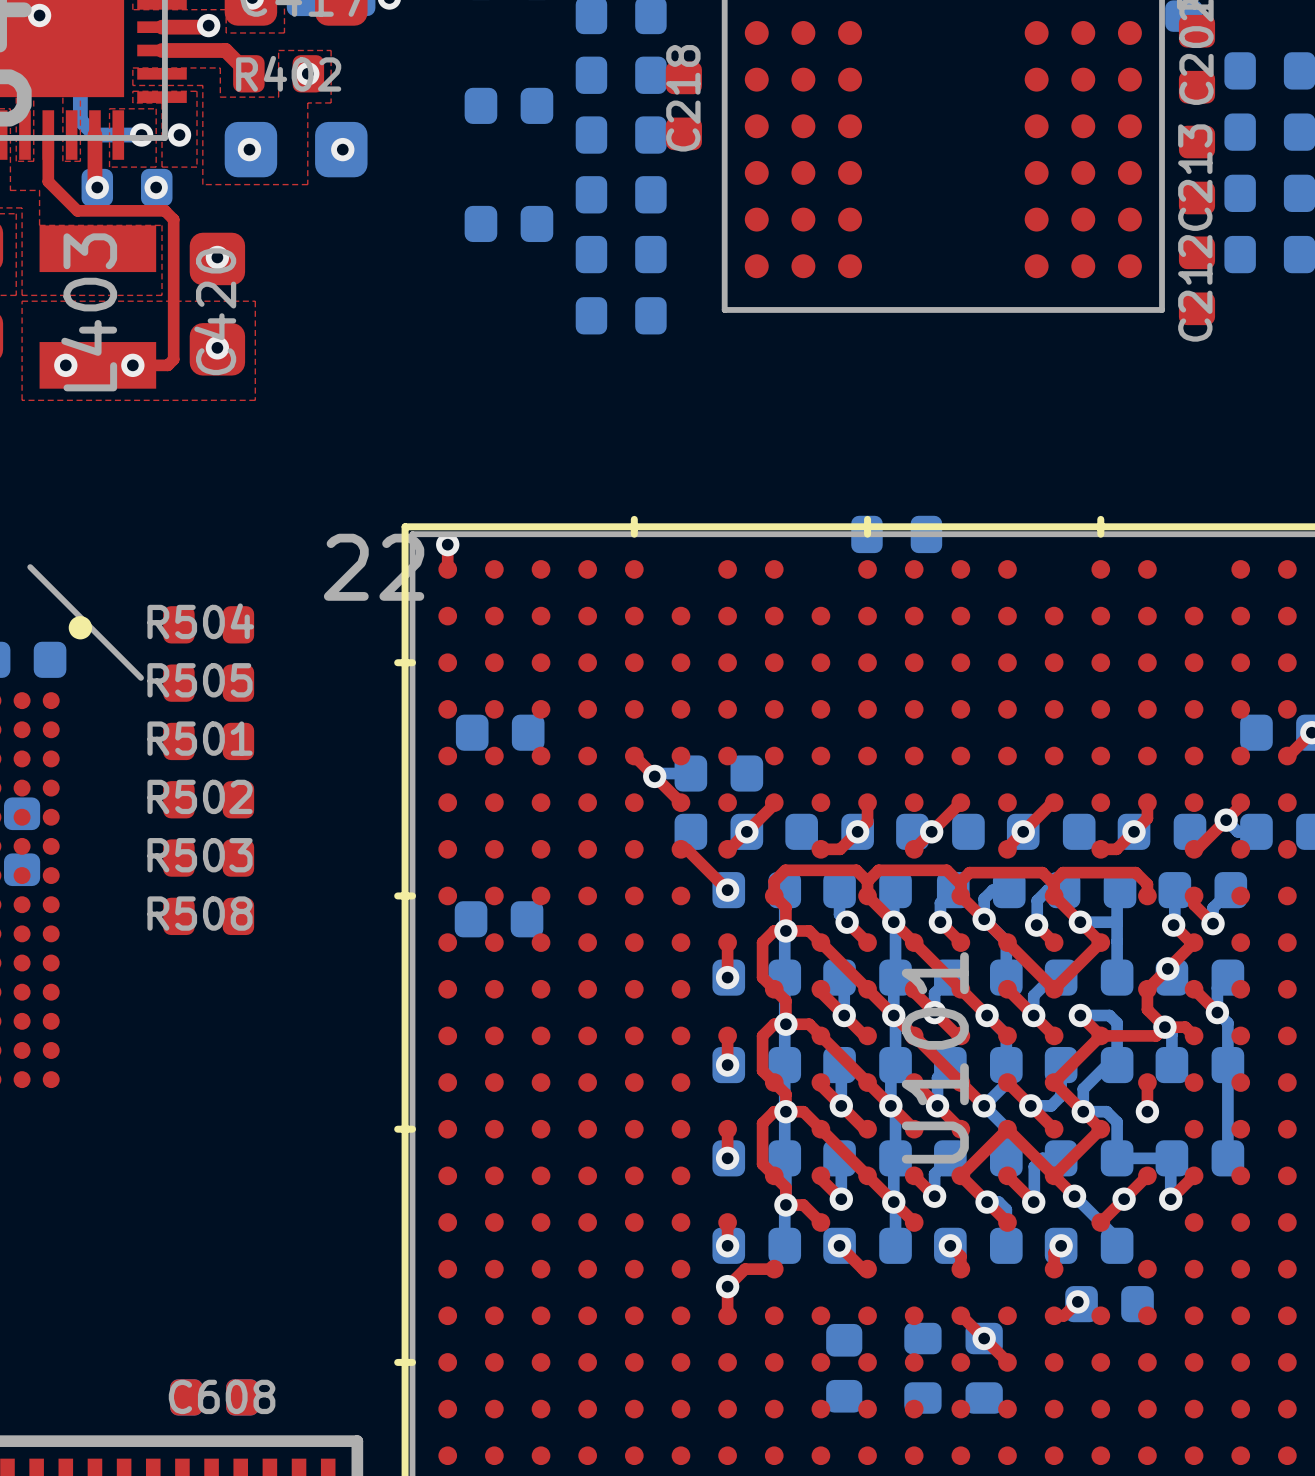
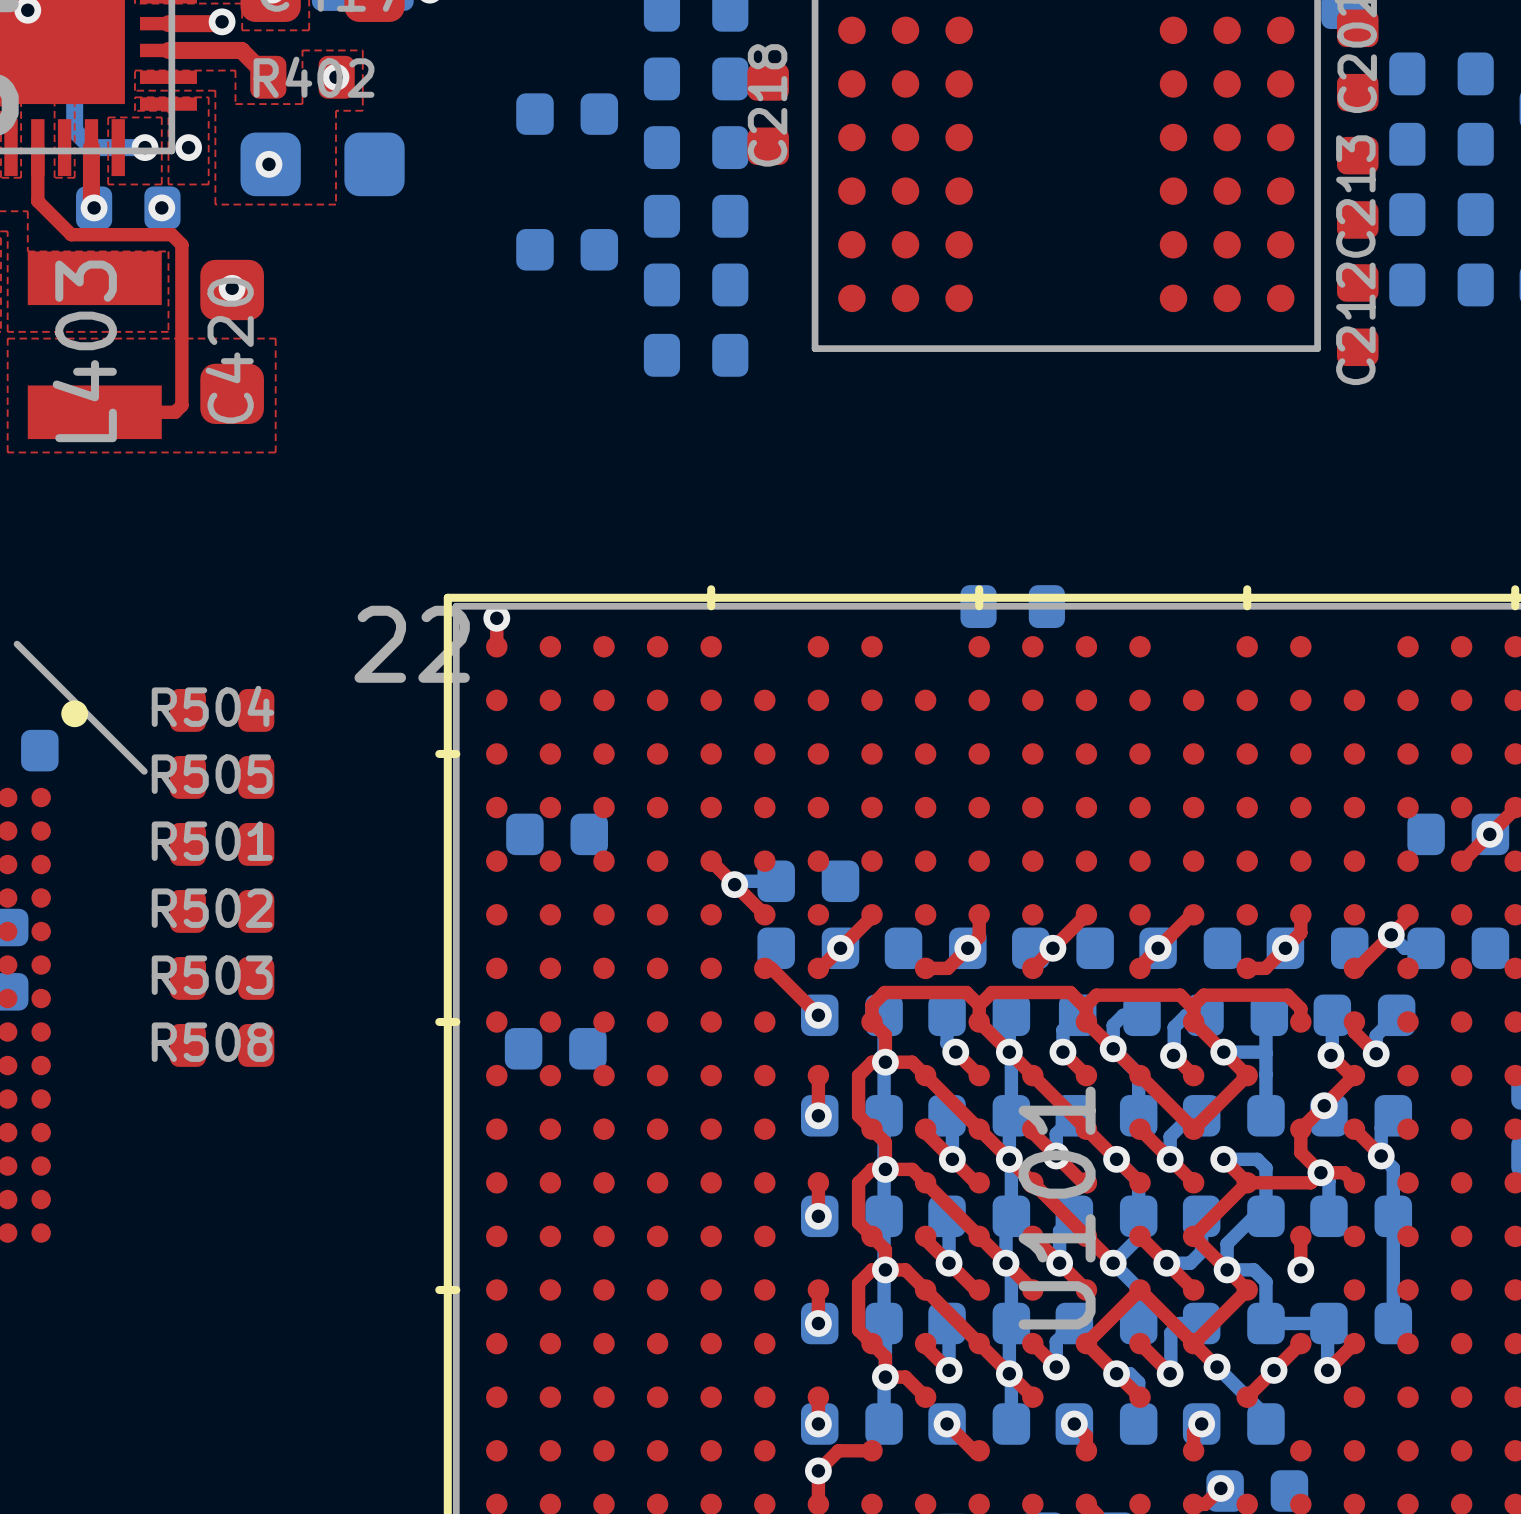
via: (342, 149) -> none
via: (217, 347) -> none
via: (65, 365) -> none
via: (132, 365) -> none

